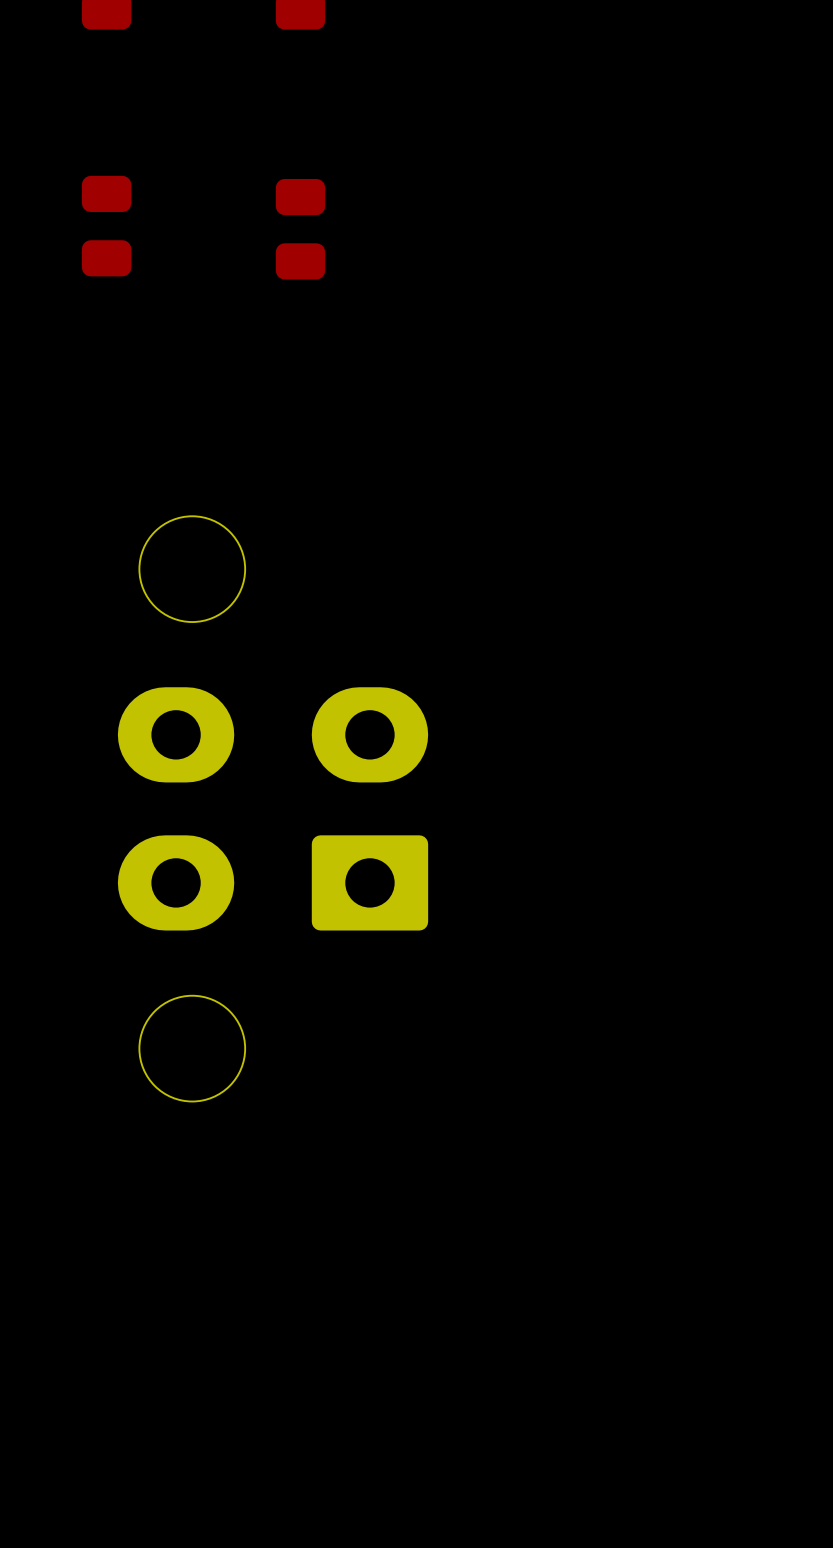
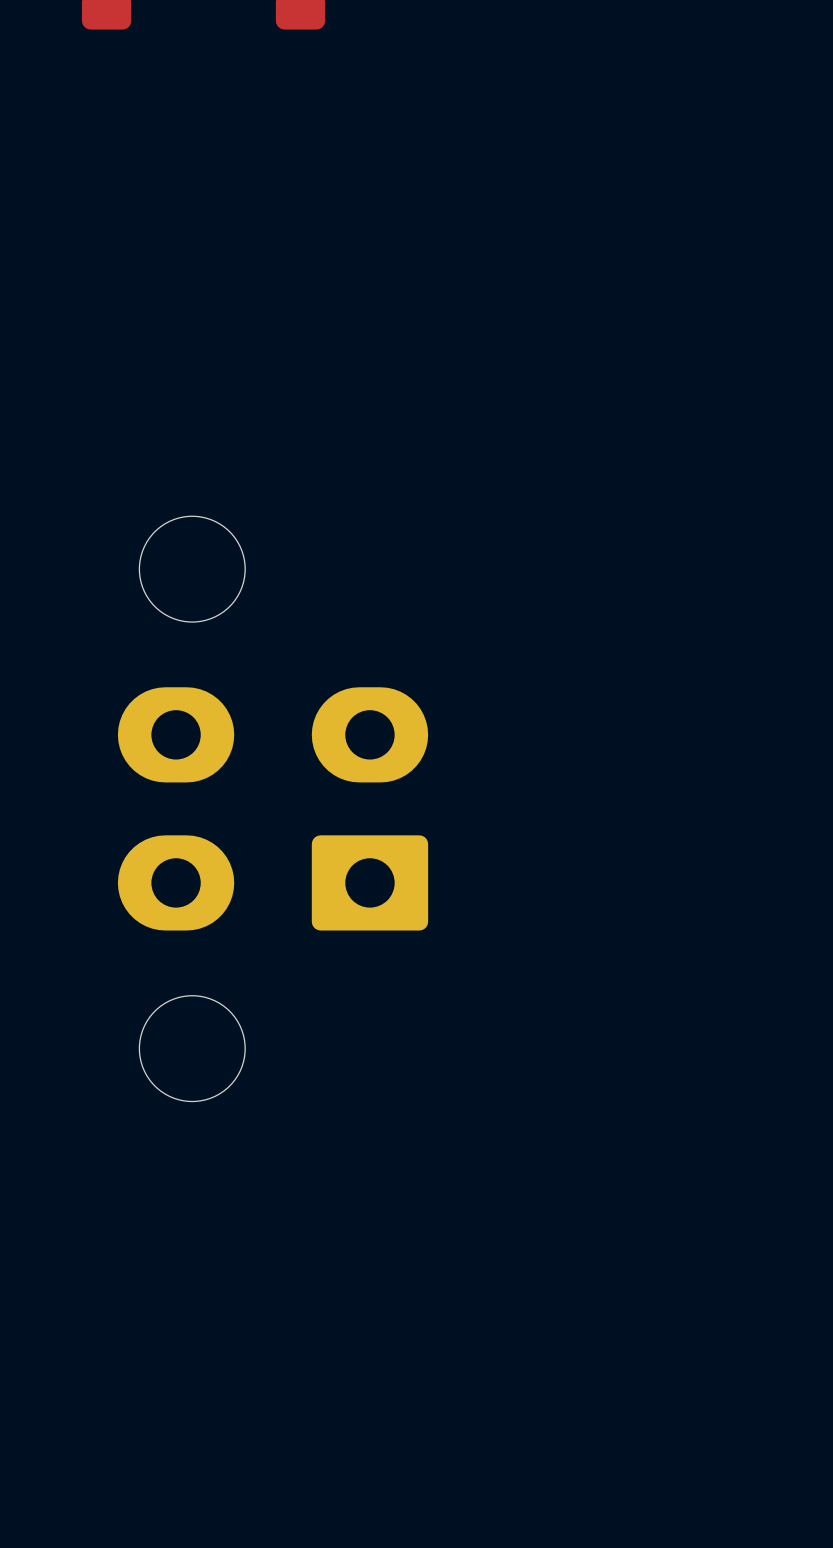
part: (106, 226) -> none
part: (300, 229) -> none

